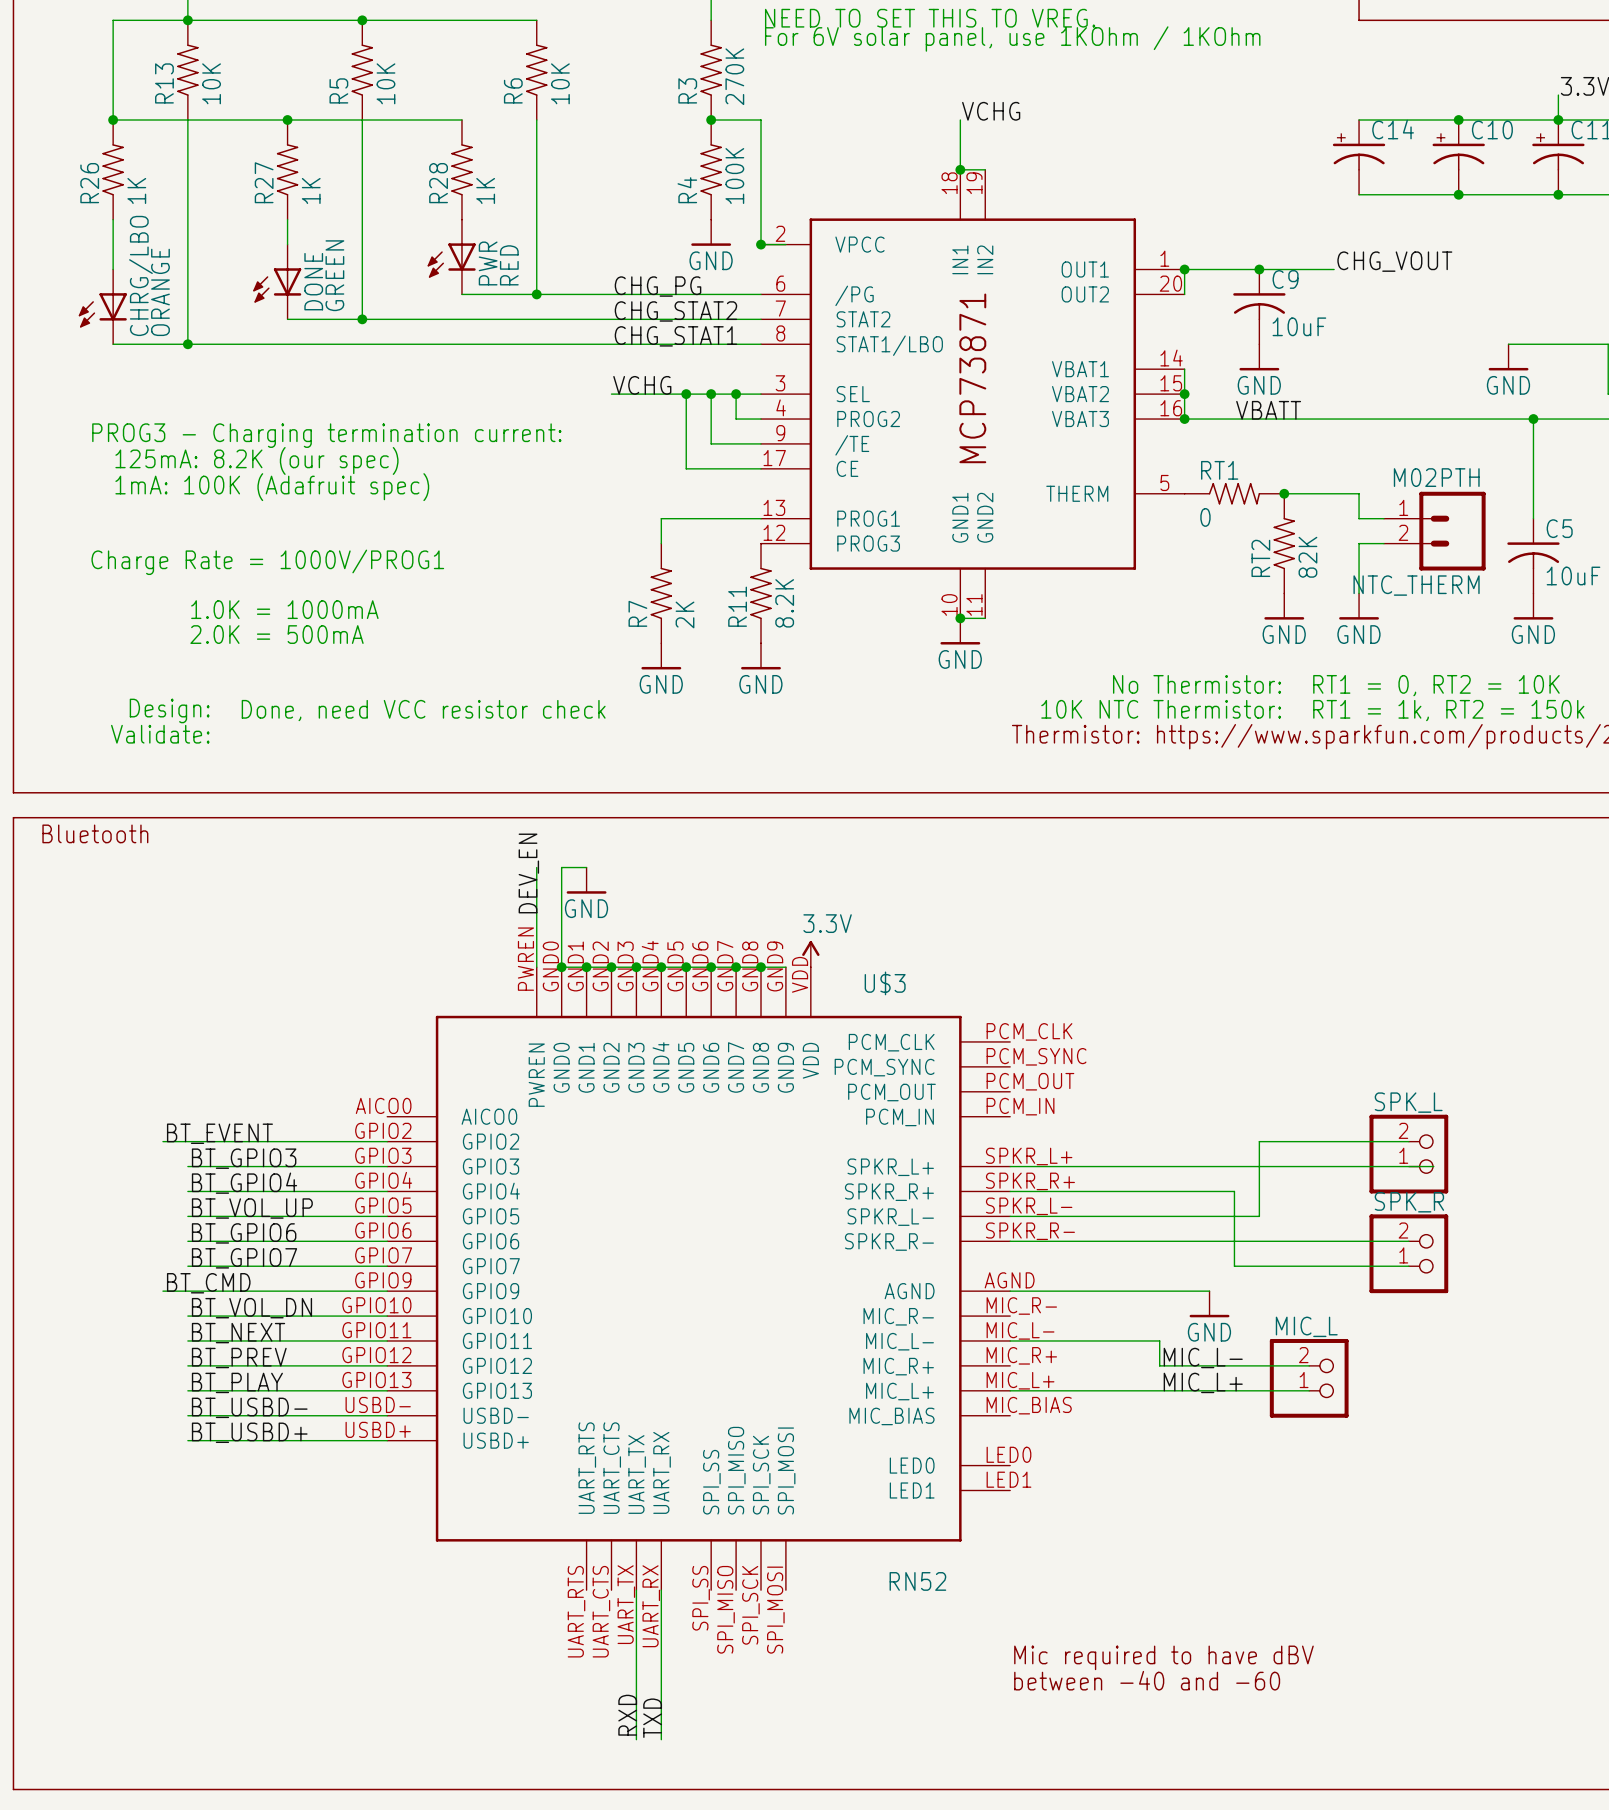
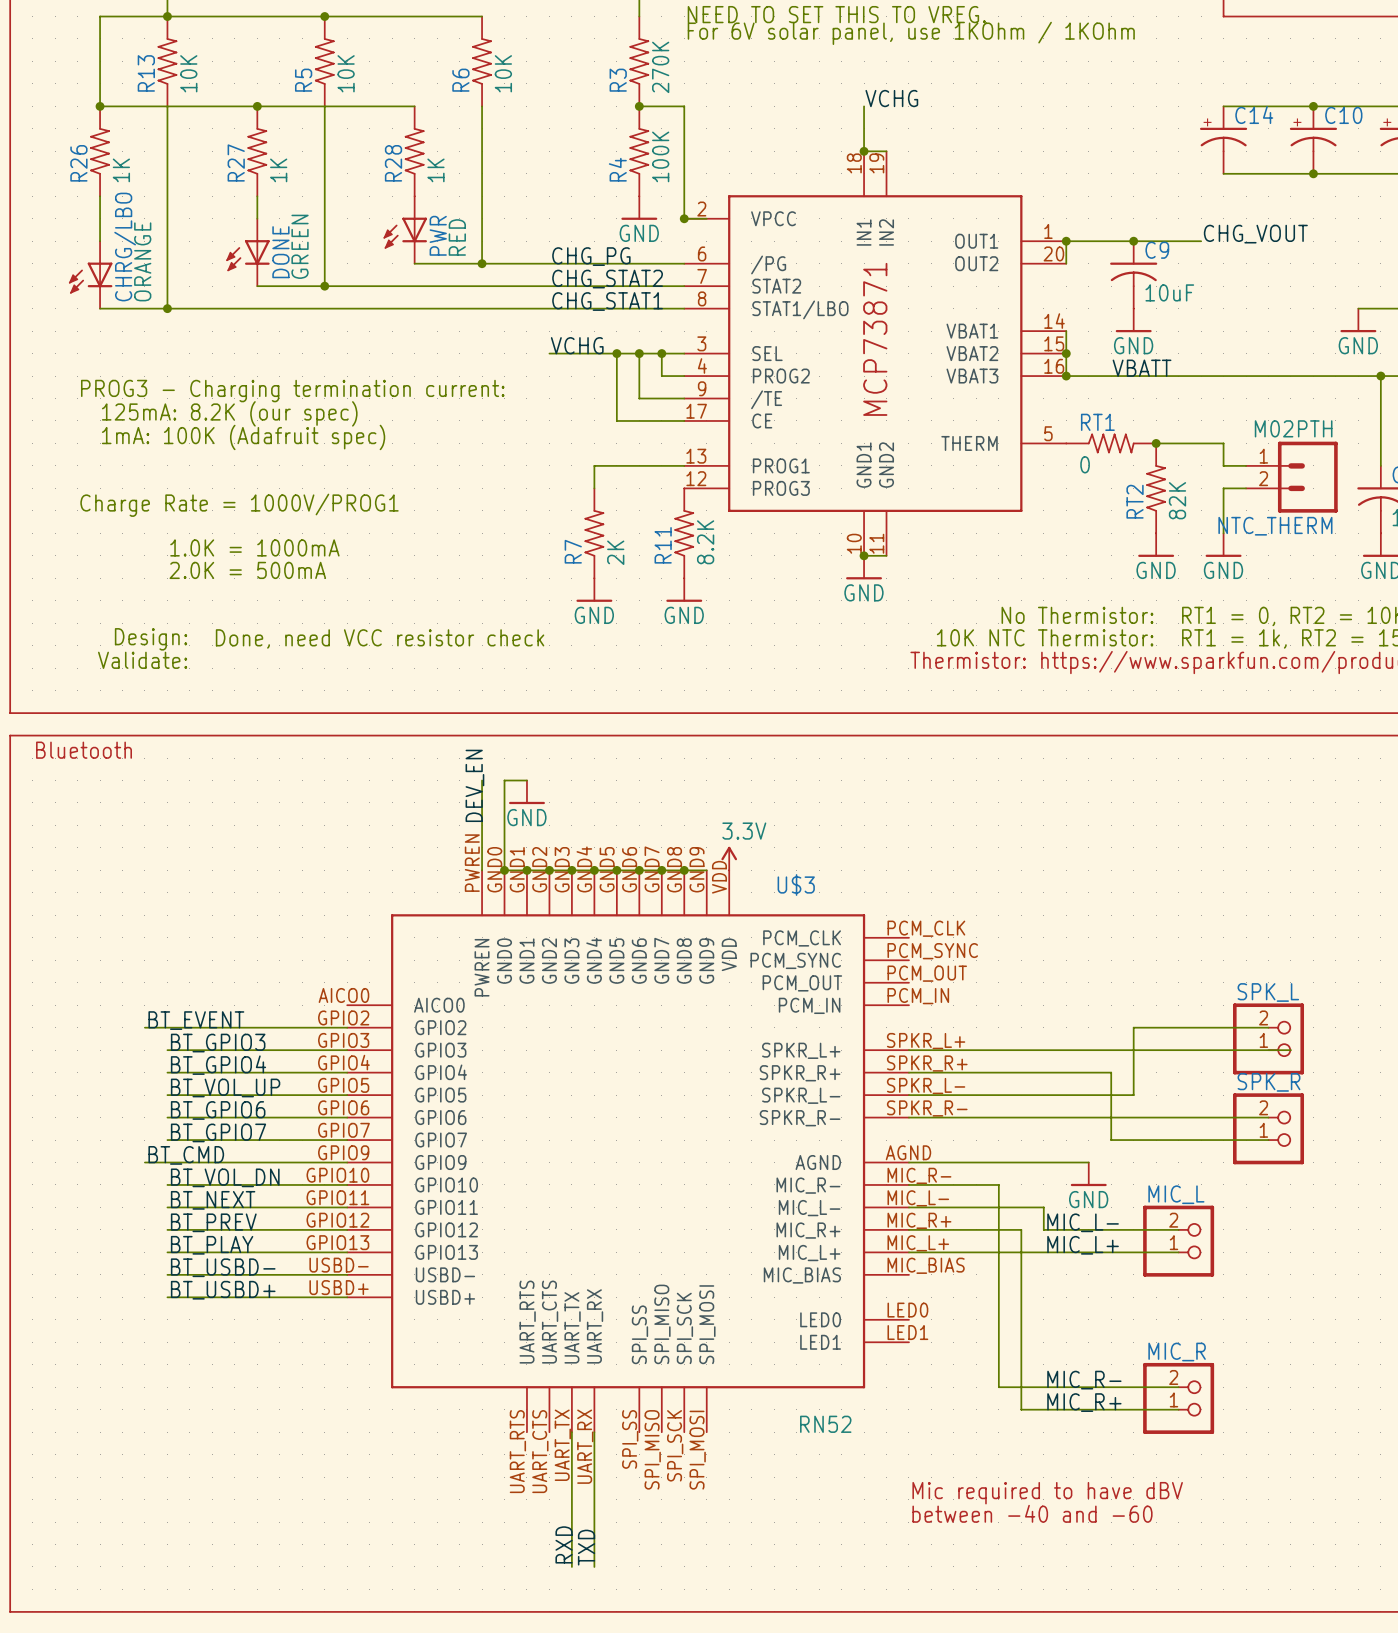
wire: none -> (908, 1184) (998, 1184) (998, 1387) (1178, 1387)
wire: none -> (908, 1229) (1021, 1229) (1021, 1409) (1178, 1409)
label: none -> MIC_R- (1084, 1380)
MIC_R: none -> (1178, 1398)
label: none -> MIC_R+ (1084, 1402)

